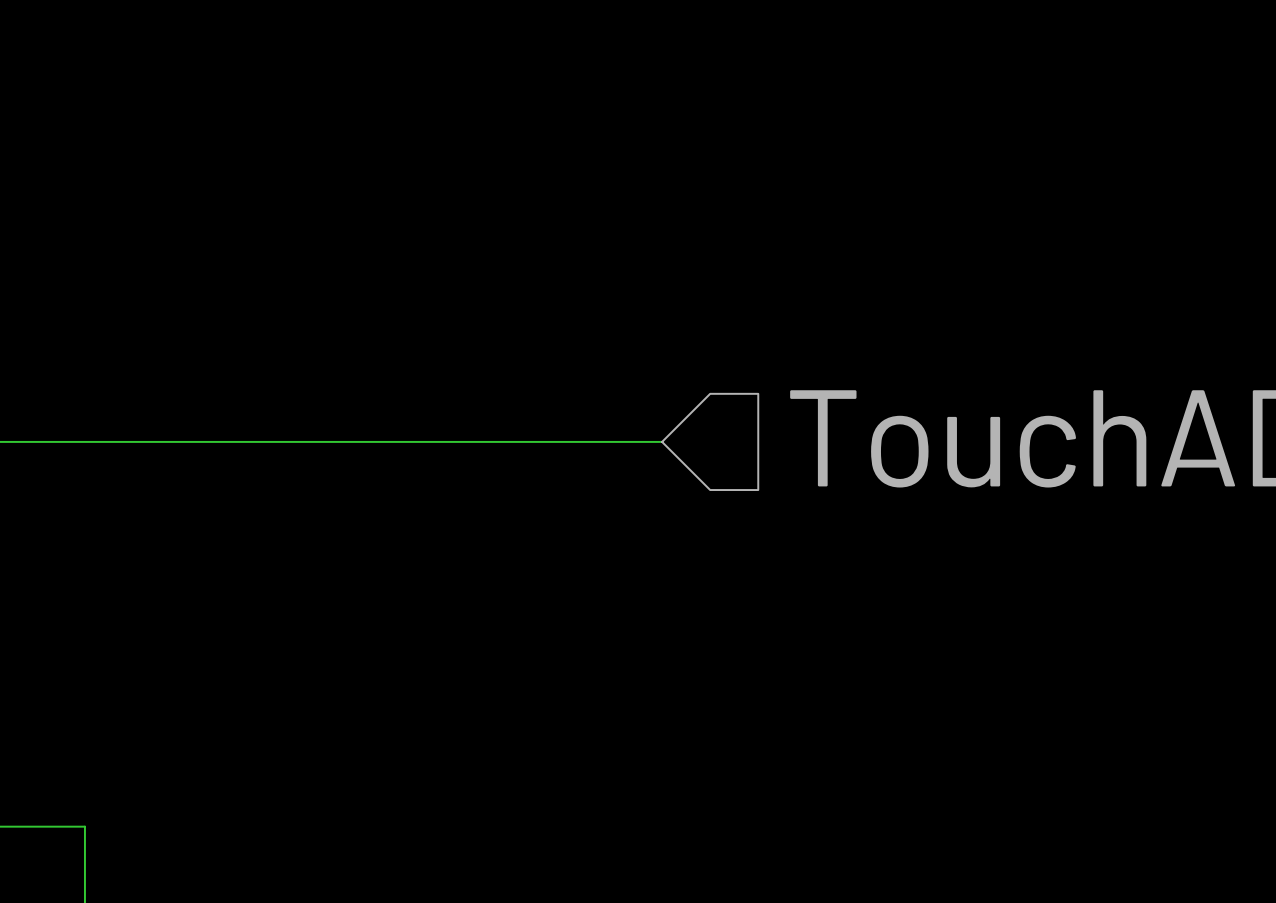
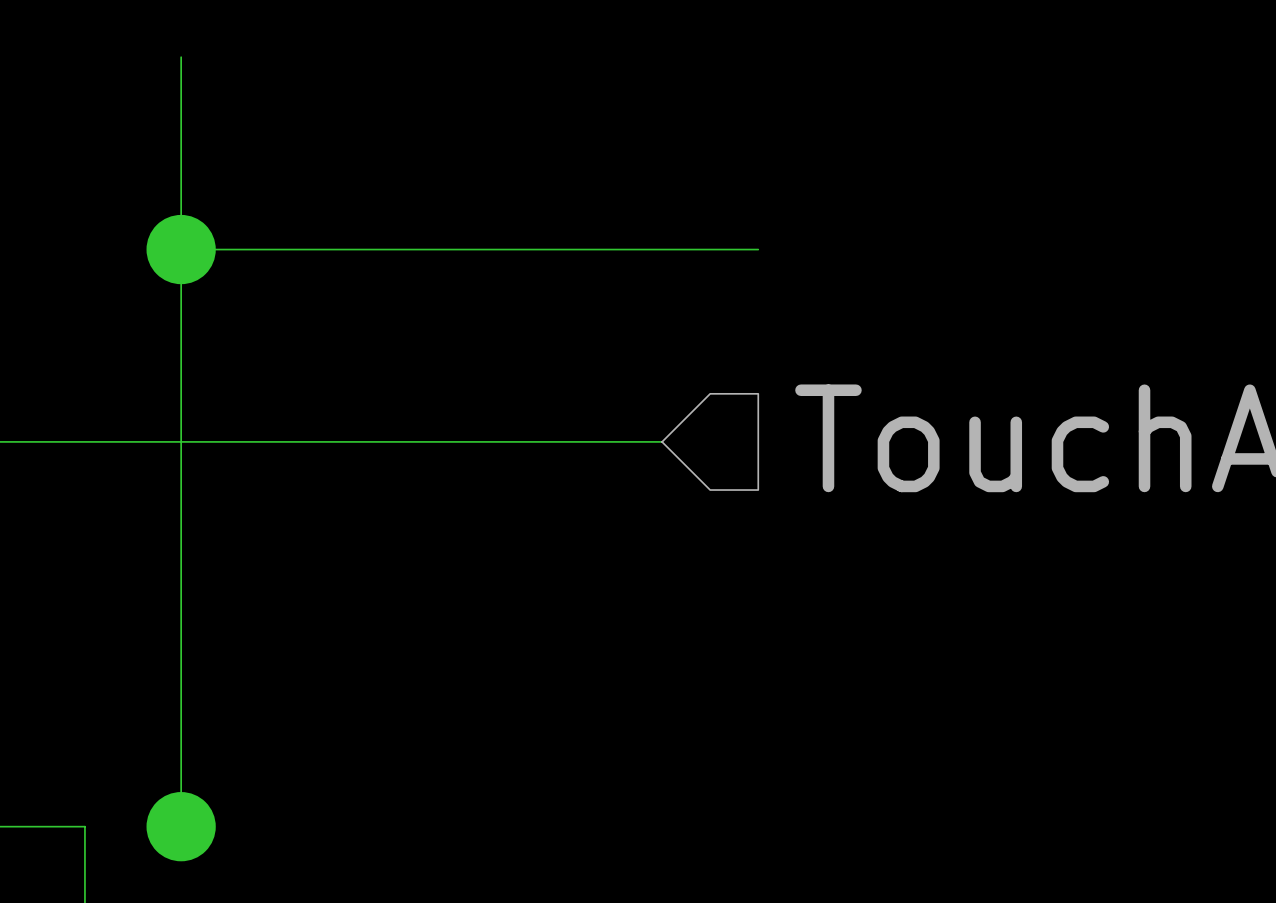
wire: none -> (181, 57) (181, 826)
wire: none -> (181, 249) (758, 249)
junction: none -> (181, 249)
junction: none -> (181, 826)

